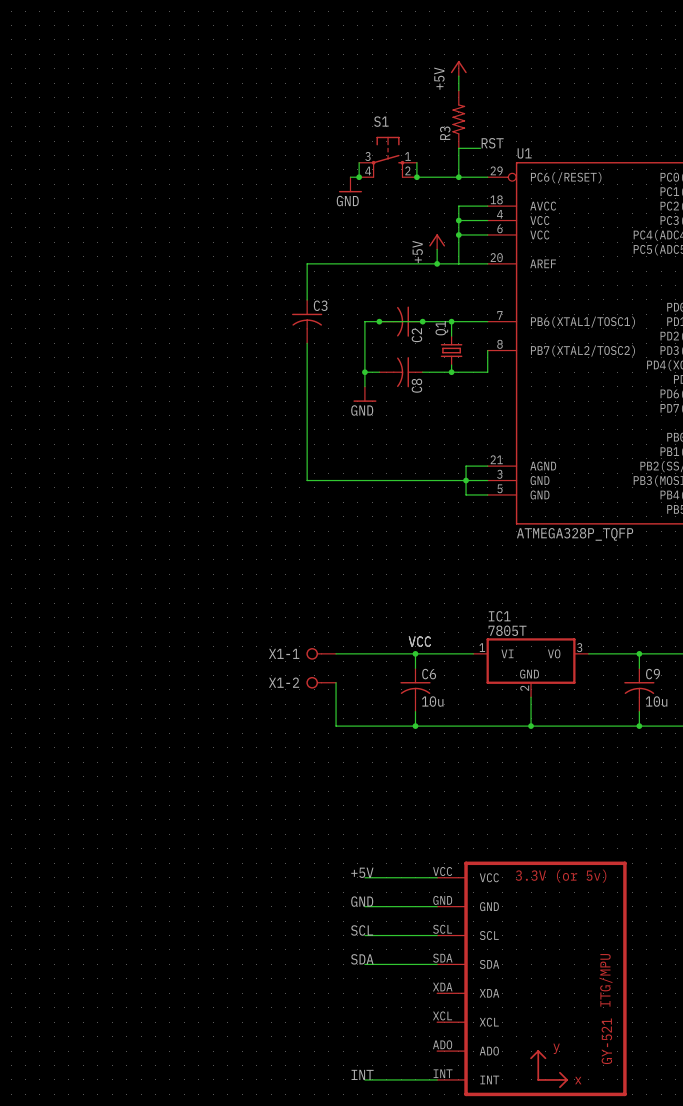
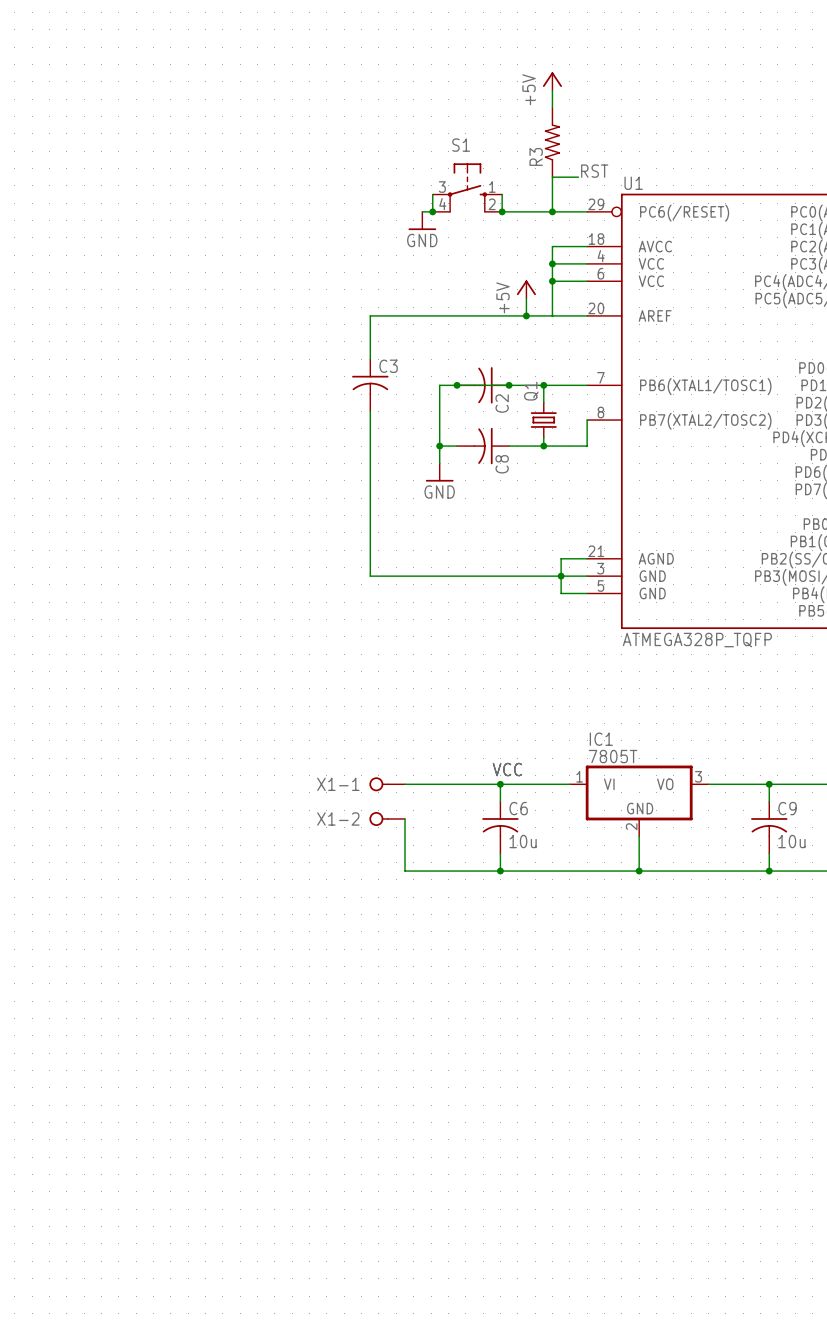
label: +5V (362, 872) -> none
wire: (364, 877) (437, 877) -> none
label: GND (362, 901) -> none
wire: (364, 906) (437, 906) -> none
label: SCL (362, 930) -> none
wire: (364, 935) (437, 935) -> none
label: SDA (362, 959) -> none
wire: (364, 964) (437, 964) -> none
part: (531, 978) -> none
label: INT (362, 1074) -> none
wire: (364, 1079) (437, 1079) -> none

